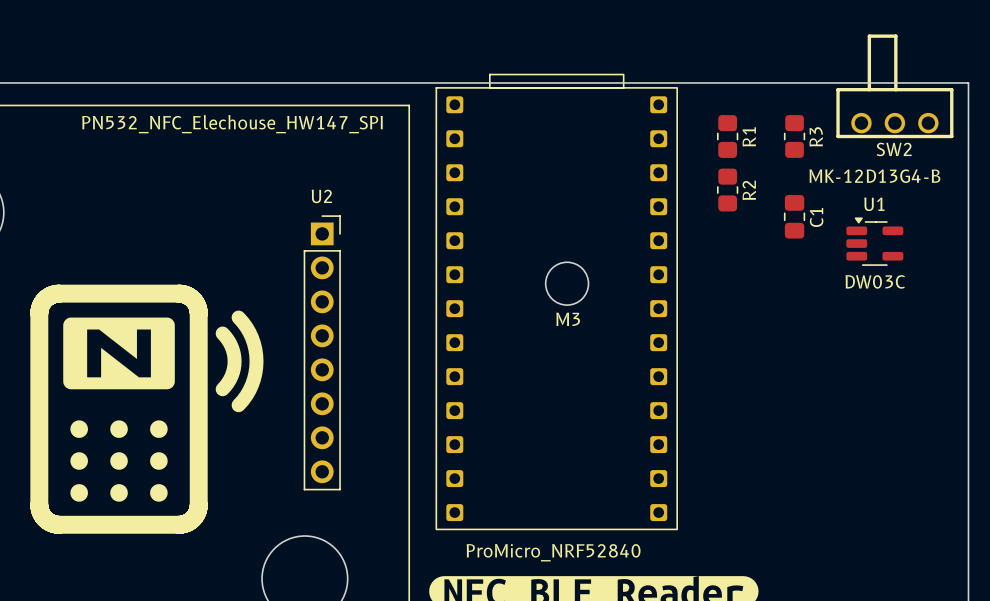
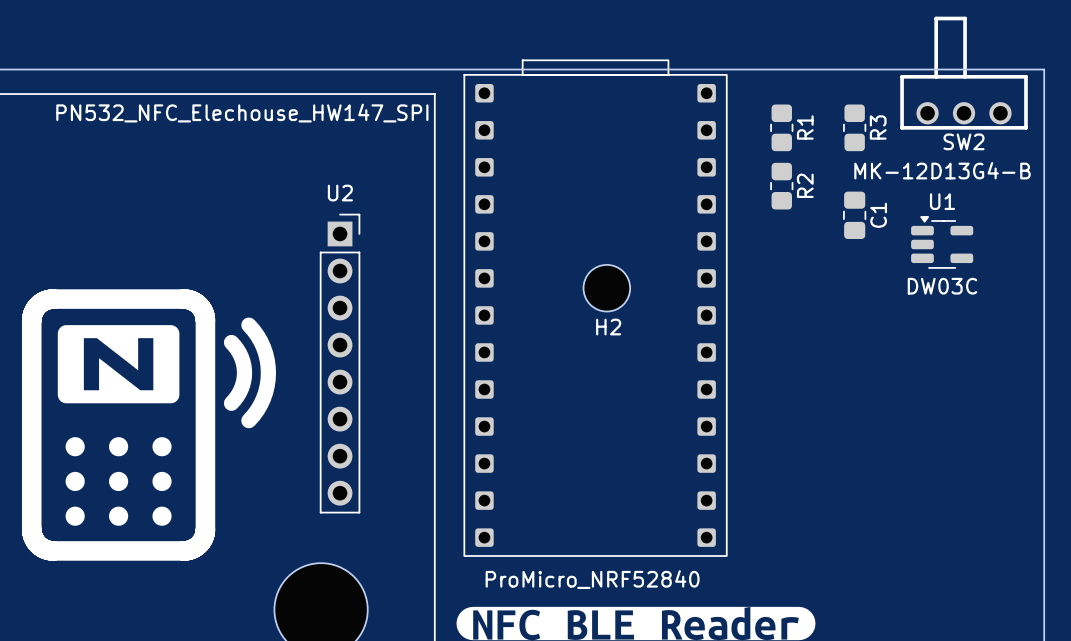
M3 name: M3 (568, 319) -> H2 (608, 327)

